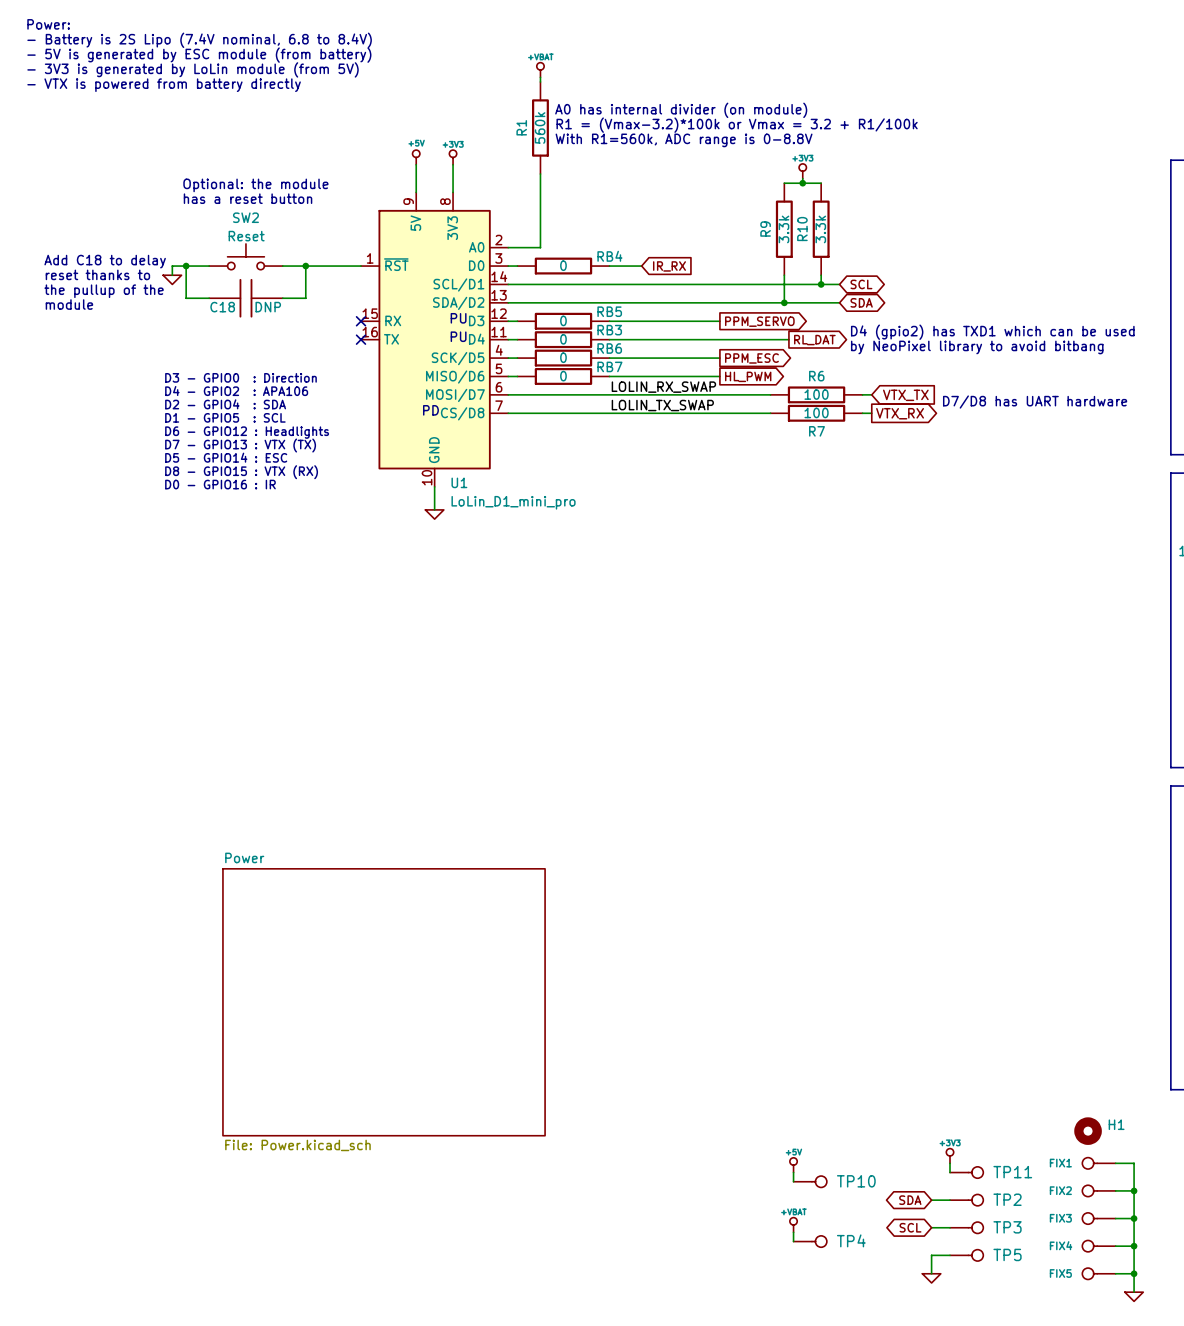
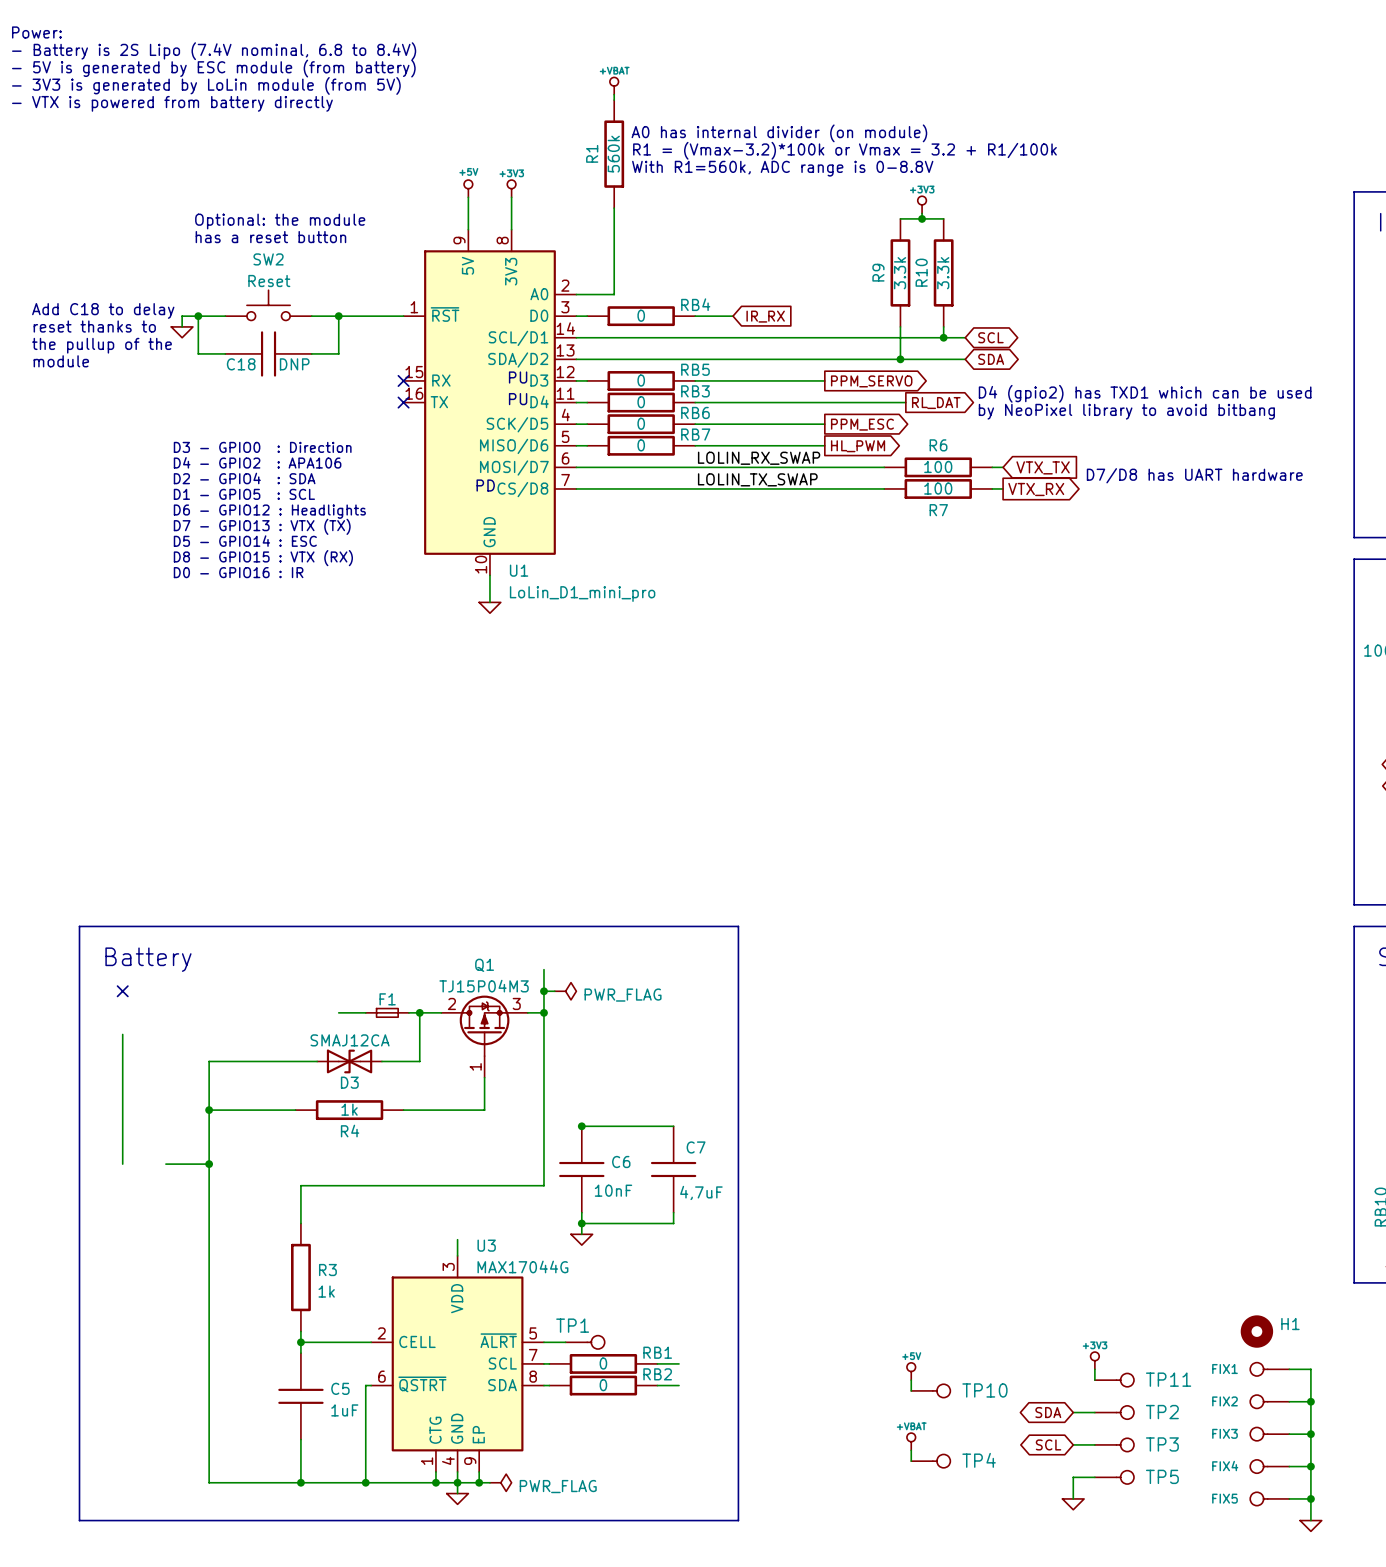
line: none -> (79, 926) (79, 1520) (738, 1520) (738, 926) (79, 926)
text: none -> Battery (148, 959)
wire: none -> (543, 969) (543, 1185) (300, 1185) (300, 1223)
no-connect mark: none -> (122, 991)
wire: none -> (543, 991) (554, 991)
junction: none -> (543, 991)
power symbol: none -> PWR_FLAG (565, 991)
wire: none -> (338, 1012) (365, 1012)
F1: none -> (387, 1012)
wire: none -> (408, 1012) (441, 1012)
wire: none -> (419, 1012) (419, 1061) (381, 1061)
junction: none -> (419, 1012)
wire: none -> (527, 1012) (543, 1012)
junction: none -> (543, 1012)
wire: none -> (122, 1034) (122, 1164)
Q1: none -> TJ15P04M3 (484, 1036)
wire: none -> (317, 1061) (209, 1061) (209, 1482) (489, 1482)
D3: none -> SMAJ12CA (349, 1061)
wire: none -> (484, 1077) (484, 1110) (403, 1110)
wire: none -> (209, 1110) (295, 1110)
junction: none -> (209, 1110)
R4: none -> 1k (349, 1110)
wire: none -> (581, 1126) (673, 1126)
junction: none -> (581, 1126)
wire: none -> (165, 1164) (209, 1164)
junction: none -> (209, 1164)
C6: none -> 10nF (581, 1169)
C7: none -> 4,7uF (673, 1169)
sheet Power: File: Power.kicad_sch (384, 1002) -> none
wire: none -> (581, 1212) (581, 1234)
wire: none -> (673, 1212) (673, 1223) (581, 1223)
junction: none -> (581, 1223)
wire: none -> (457, 1239) (457, 1255)
power symbol: none -> (581, 1239)
R3: none -> 1k (300, 1277)
wire: none -> (300, 1331) (300, 1353)
wire: none -> (300, 1342) (371, 1342)
junction: none -> (300, 1342)
wire: none -> (543, 1342) (565, 1342)
TP1: none -> (585, 1342)
U3: none -> MAX17044G (457, 1363)
wire: none -> (543, 1363) (549, 1363)
RB1: none -> 0 (603, 1363)
wire: none -> (657, 1363) (679, 1363)
wire: none -> (371, 1385) (365, 1385) (365, 1482)
wire: none -> (543, 1385) (549, 1385)
RB2: none -> 0 (603, 1385)
wire: none -> (657, 1385) (679, 1385)
C5: none -> 1uF (300, 1396)
wire: none -> (300, 1439) (300, 1482)
wire: none -> (435, 1471) (435, 1482)
wire: none -> (457, 1471) (457, 1493)
wire: none -> (479, 1471) (479, 1482)
junction: none -> (300, 1482)
junction: none -> (365, 1482)
junction: none -> (435, 1482)
junction: none -> (457, 1482)
junction: none -> (479, 1482)
power symbol: none -> PWR_FLAG (500, 1482)
power symbol: none -> (457, 1498)

